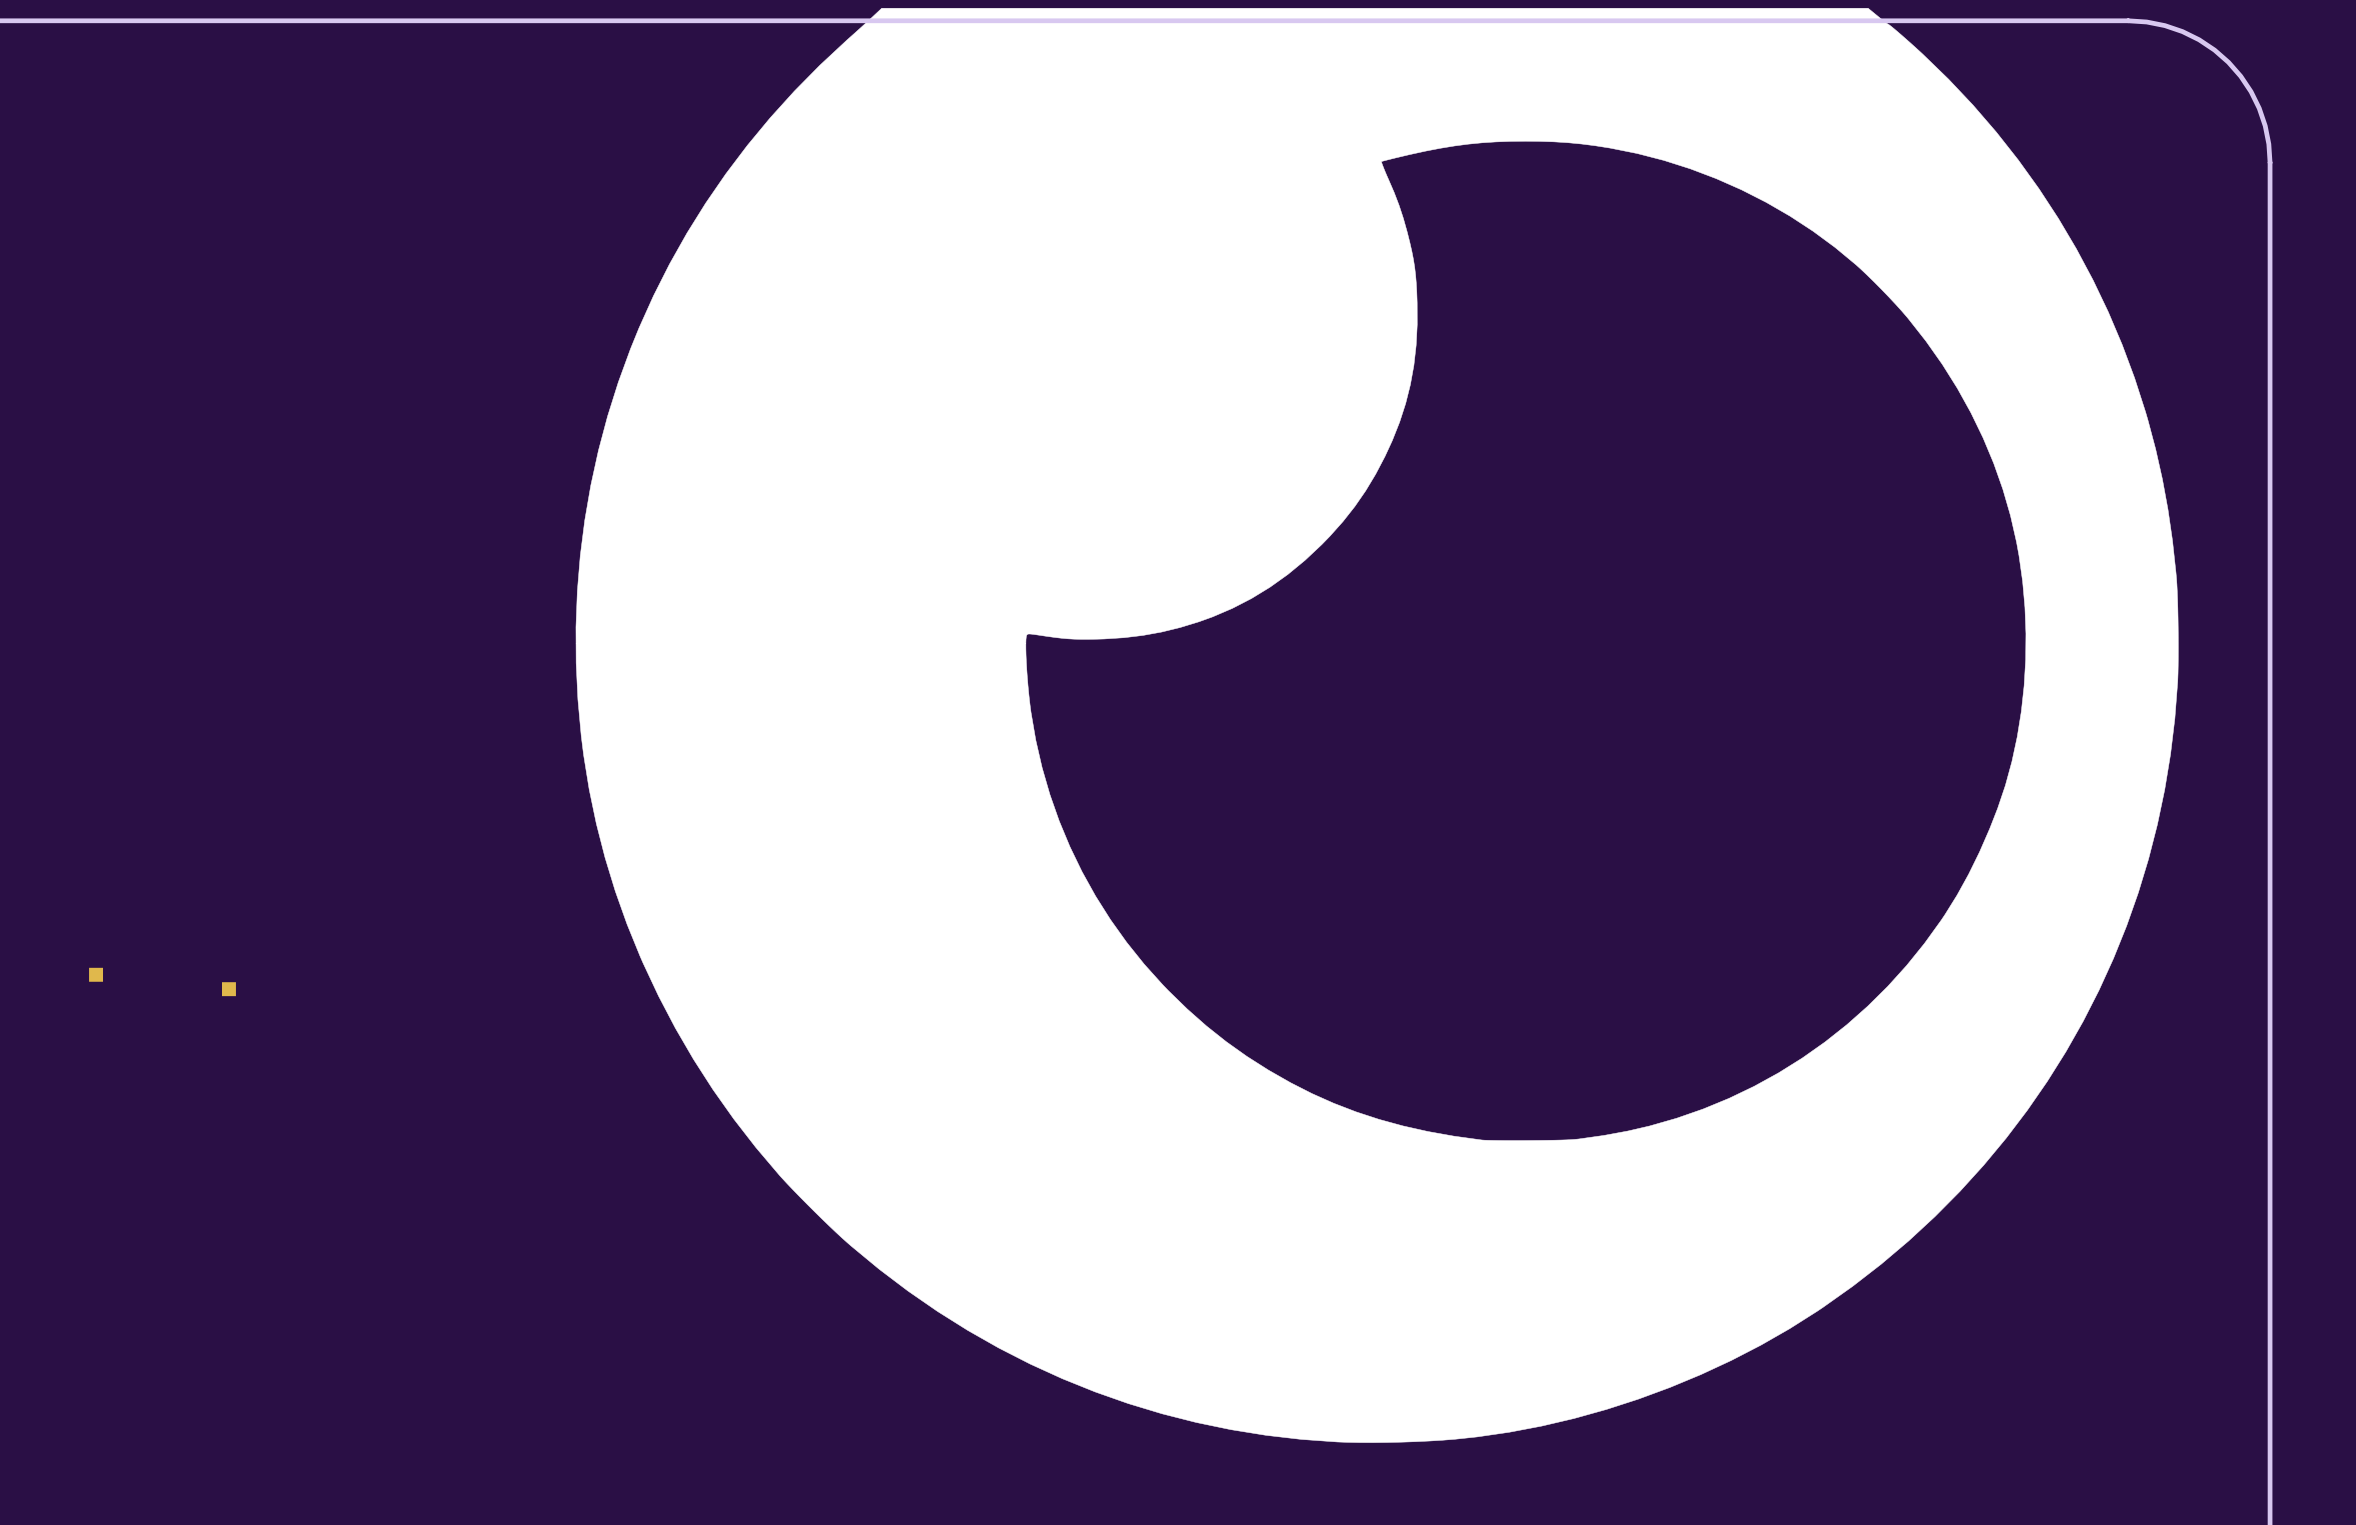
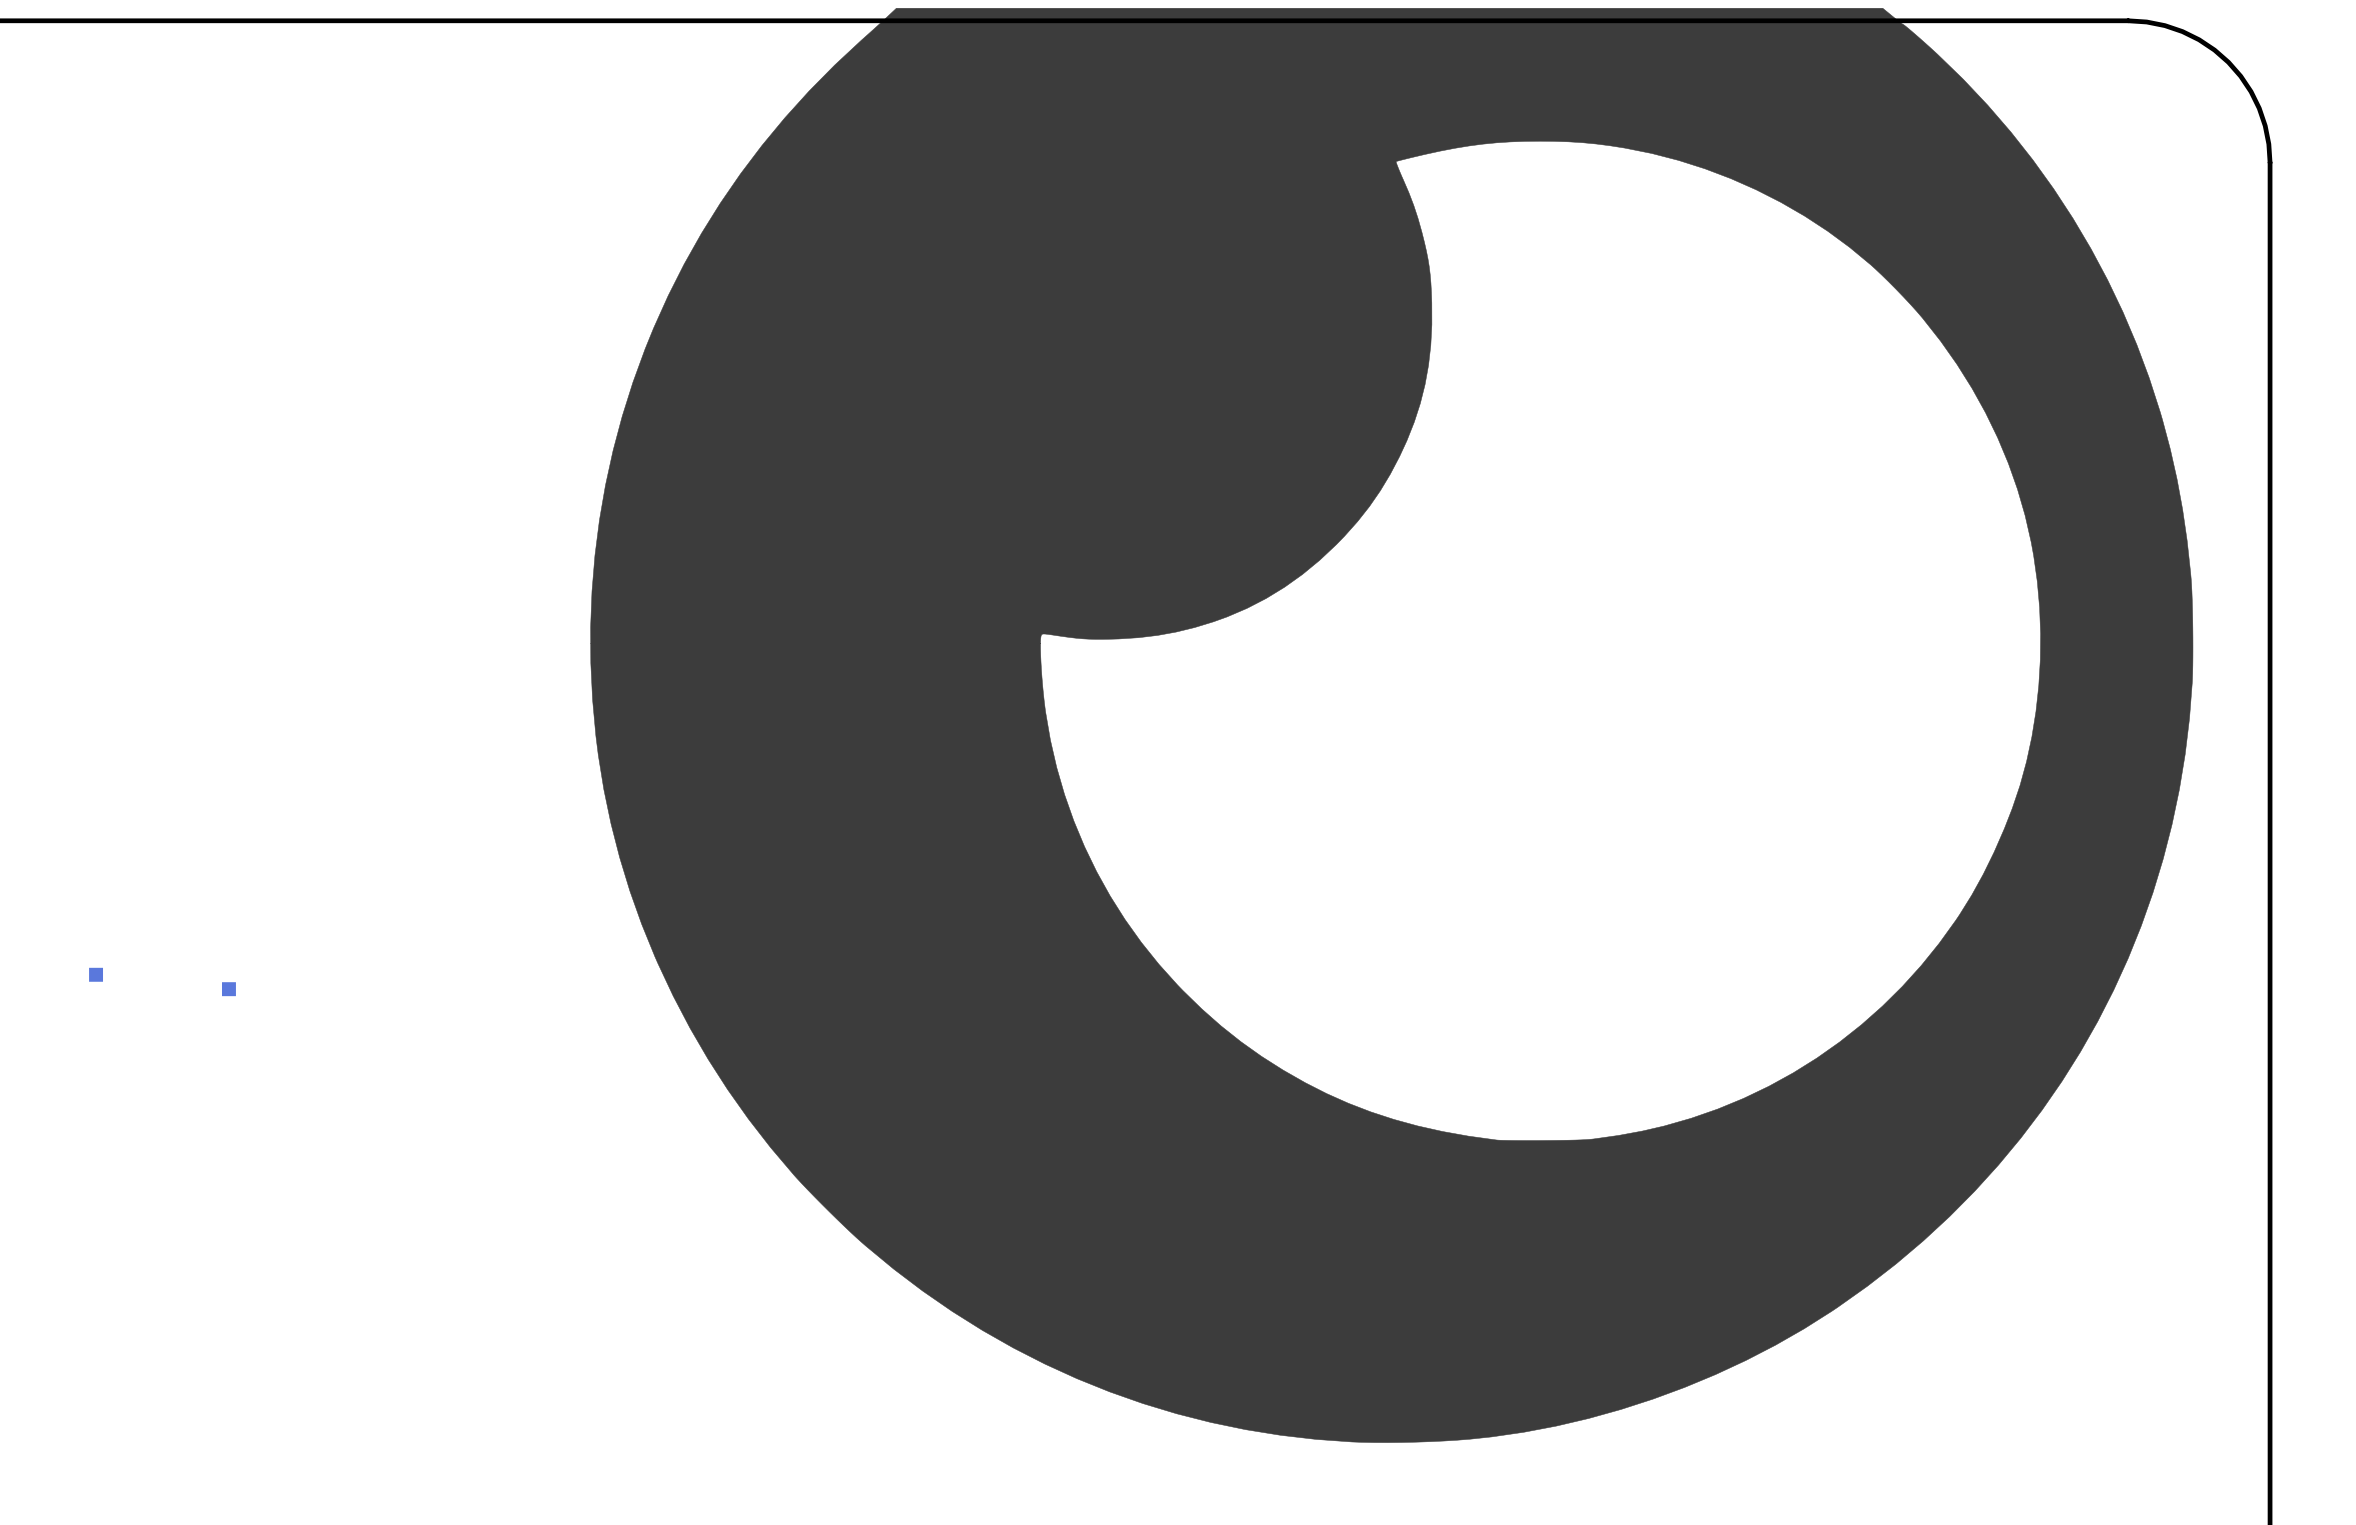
drawing position: (1377, 725) -> (1391, 725)

